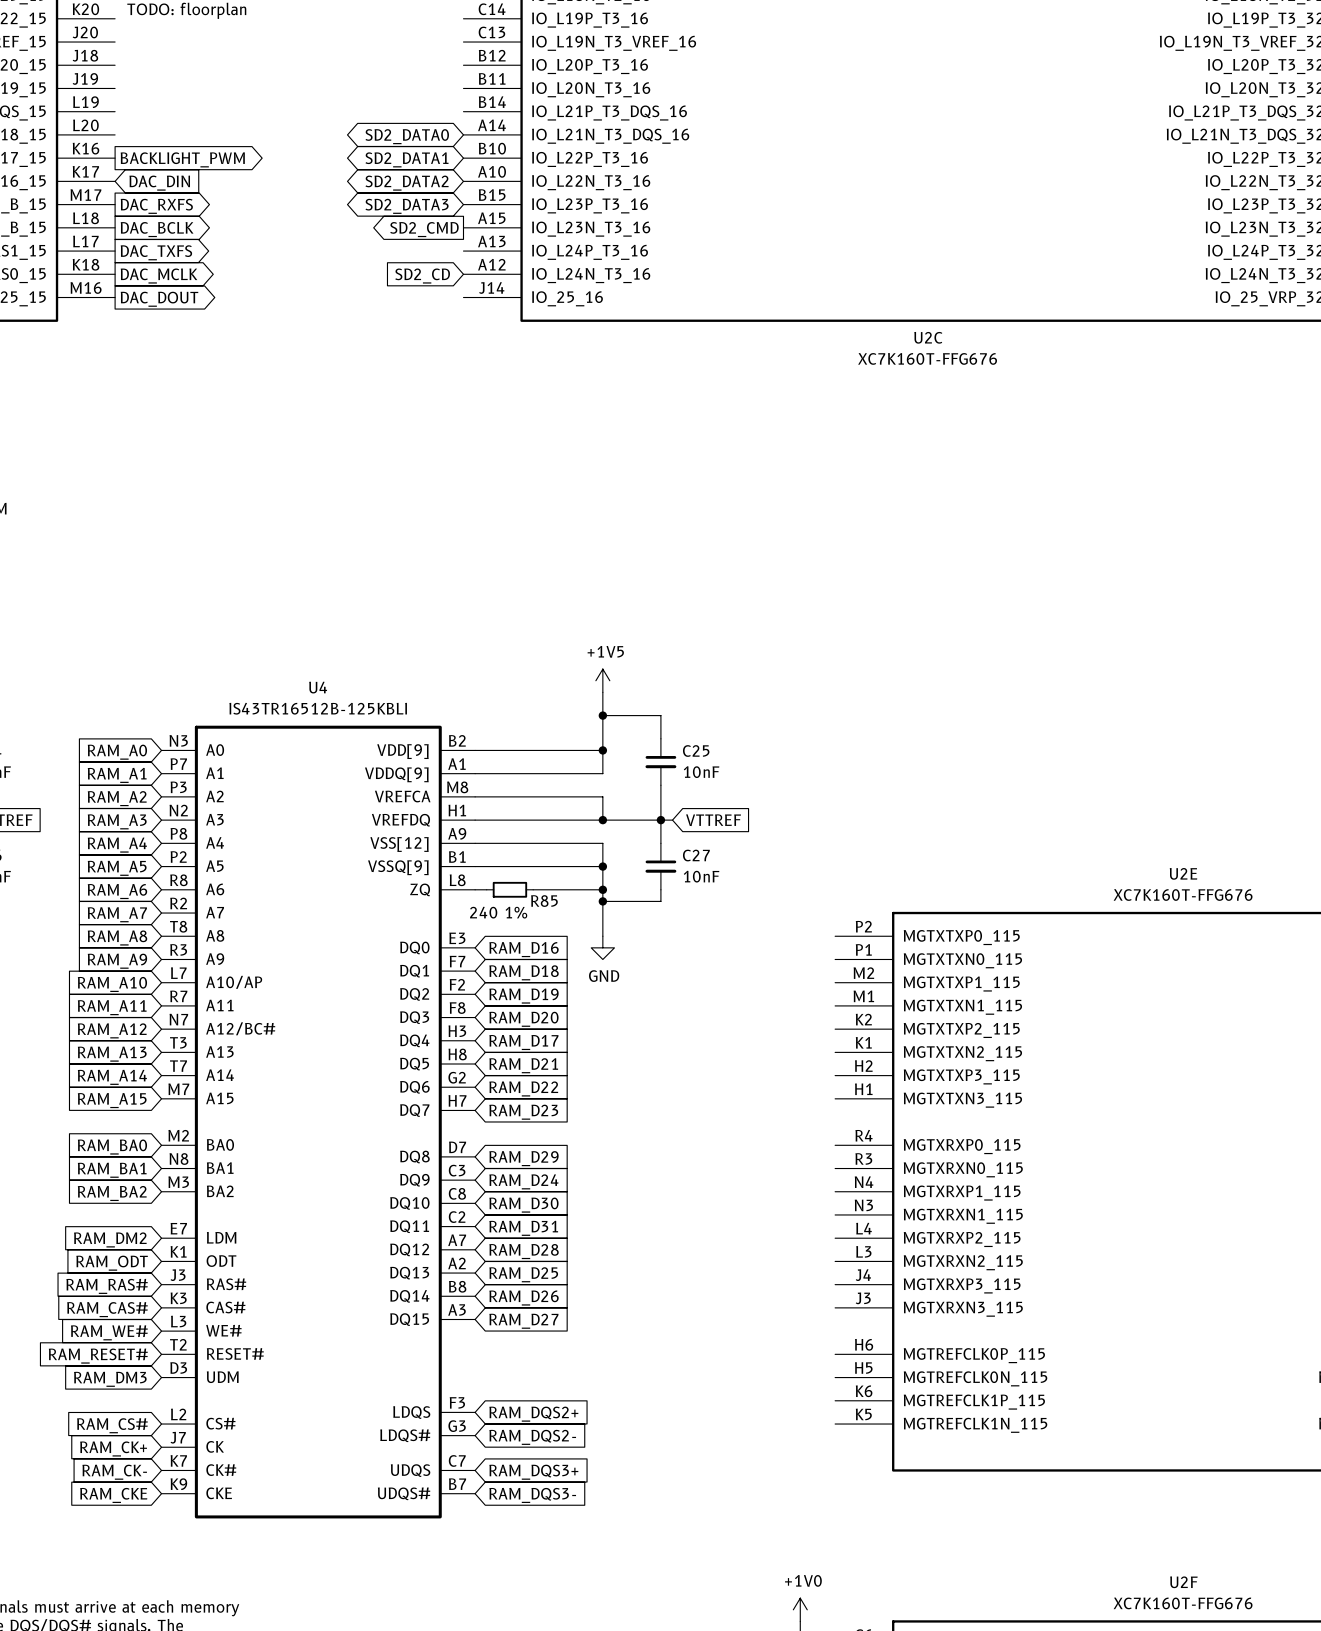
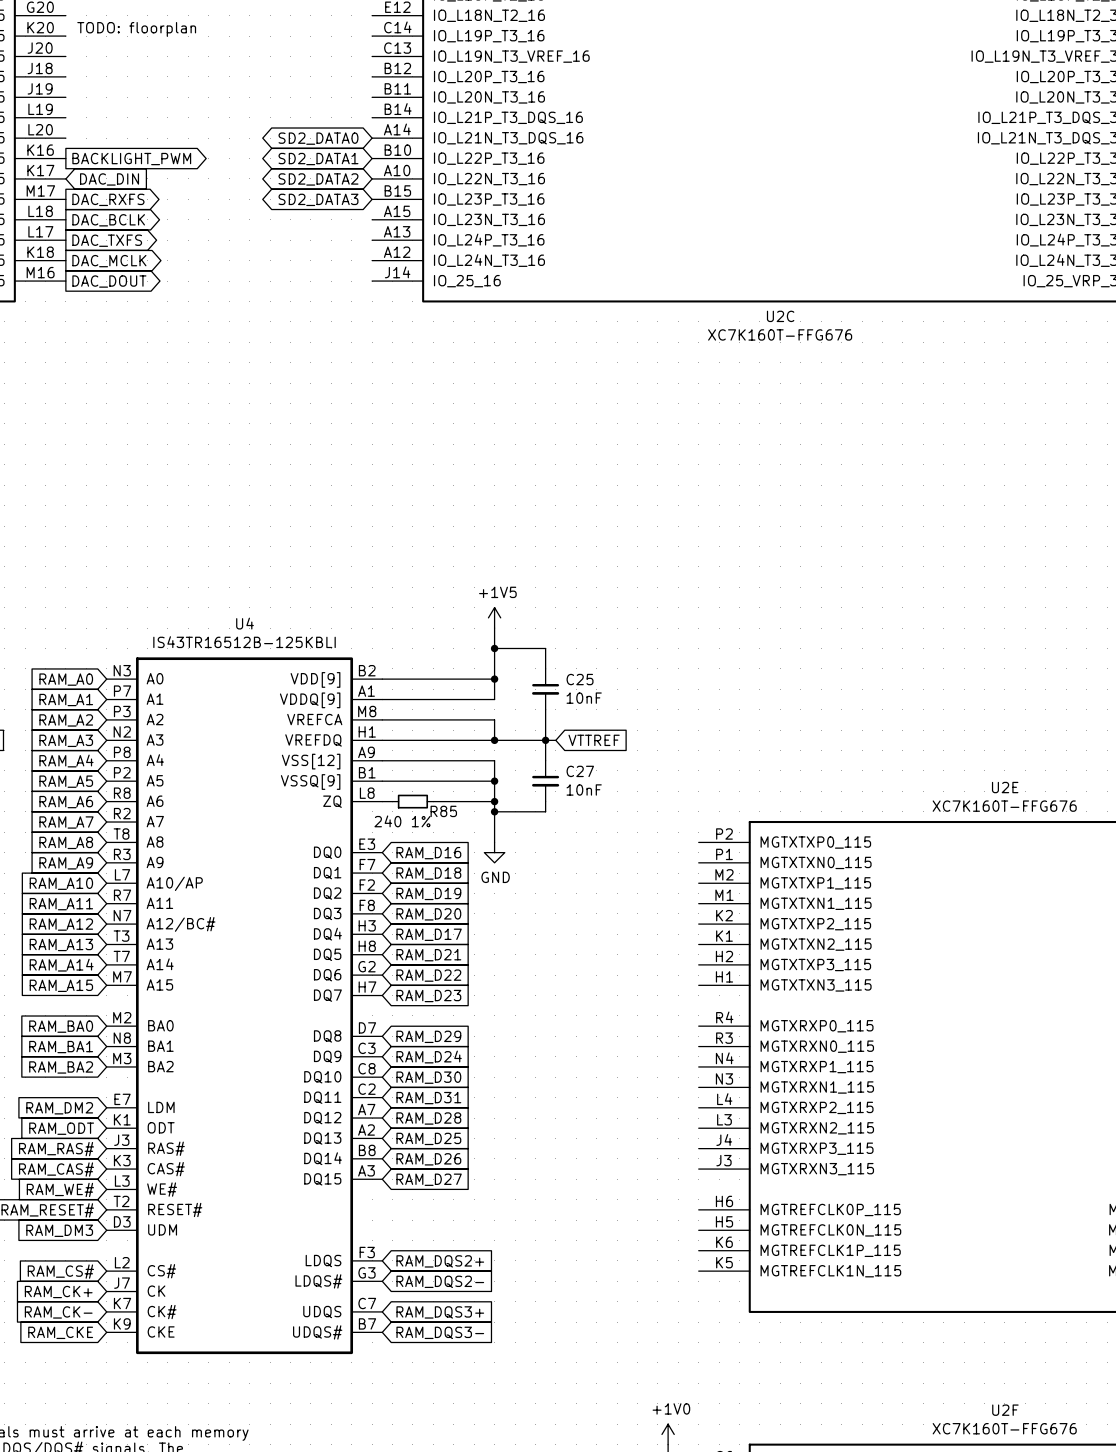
global label: SD2_CMD (424, 229) -> none
global label: SD2_CD (422, 276) -> none

